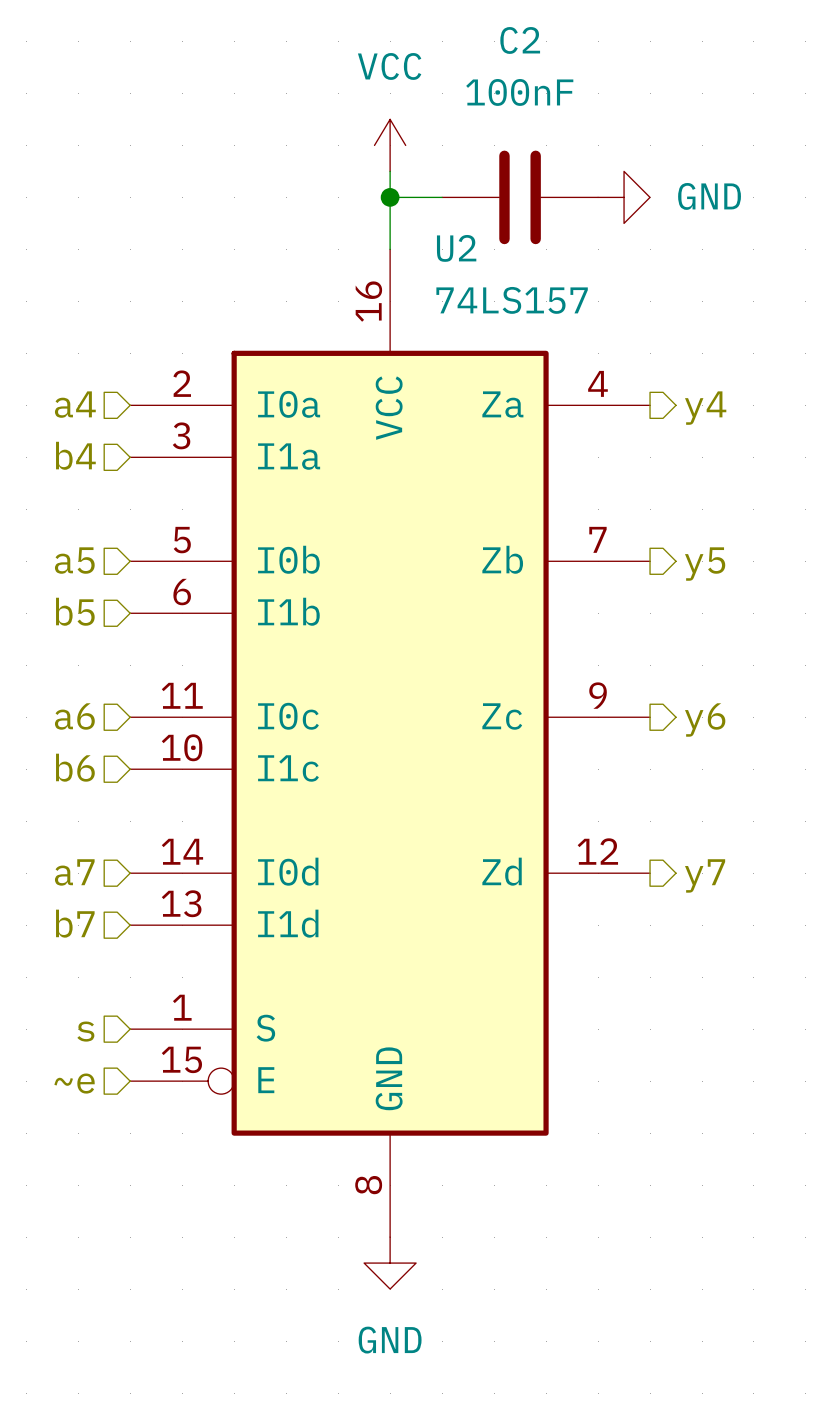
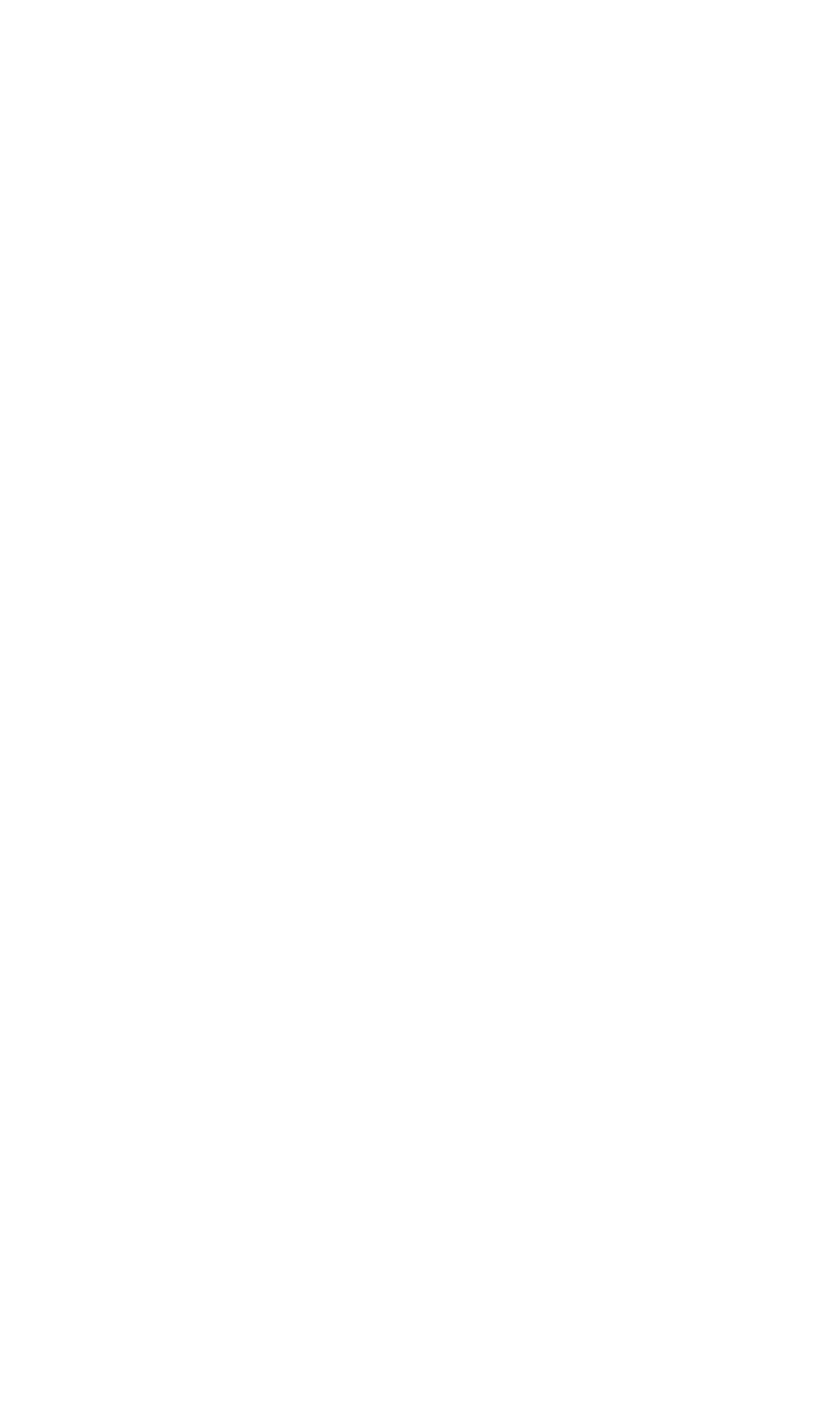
power symbol: VCC (390, 145) -> none
wire: (390, 171) (390, 249) -> none
wire: (390, 197) (442, 197) -> none
junction: (390, 197) -> none
C2: 100nF (520, 197) -> none
power symbol: GND (624, 197) -> none
hierarchical label: a4 (75, 404) -> none
hierarchical label: y4 (705, 408) -> none
hierarchical label: b4 (75, 455) -> none
hierarchical label: a5 (74, 560) -> none
hierarchical label: y5 (705, 564) -> none
hierarchical label: b5 (75, 611) -> none
hierarchical label: a6 (74, 716) -> none
hierarchical label: y6 (705, 719) -> none
U2: 74LS157 (390, 743) -> none
hierarchical label: b6 (75, 767) -> none
hierarchical label: a7 (74, 872) -> none
hierarchical label: y7 (705, 875) -> none
hierarchical label: b7 (75, 923) -> none
hierarchical label: s (85, 1031) -> none
hierarchical label: ~e (74, 1083) -> none
power symbol: GND (390, 1263) -> none

